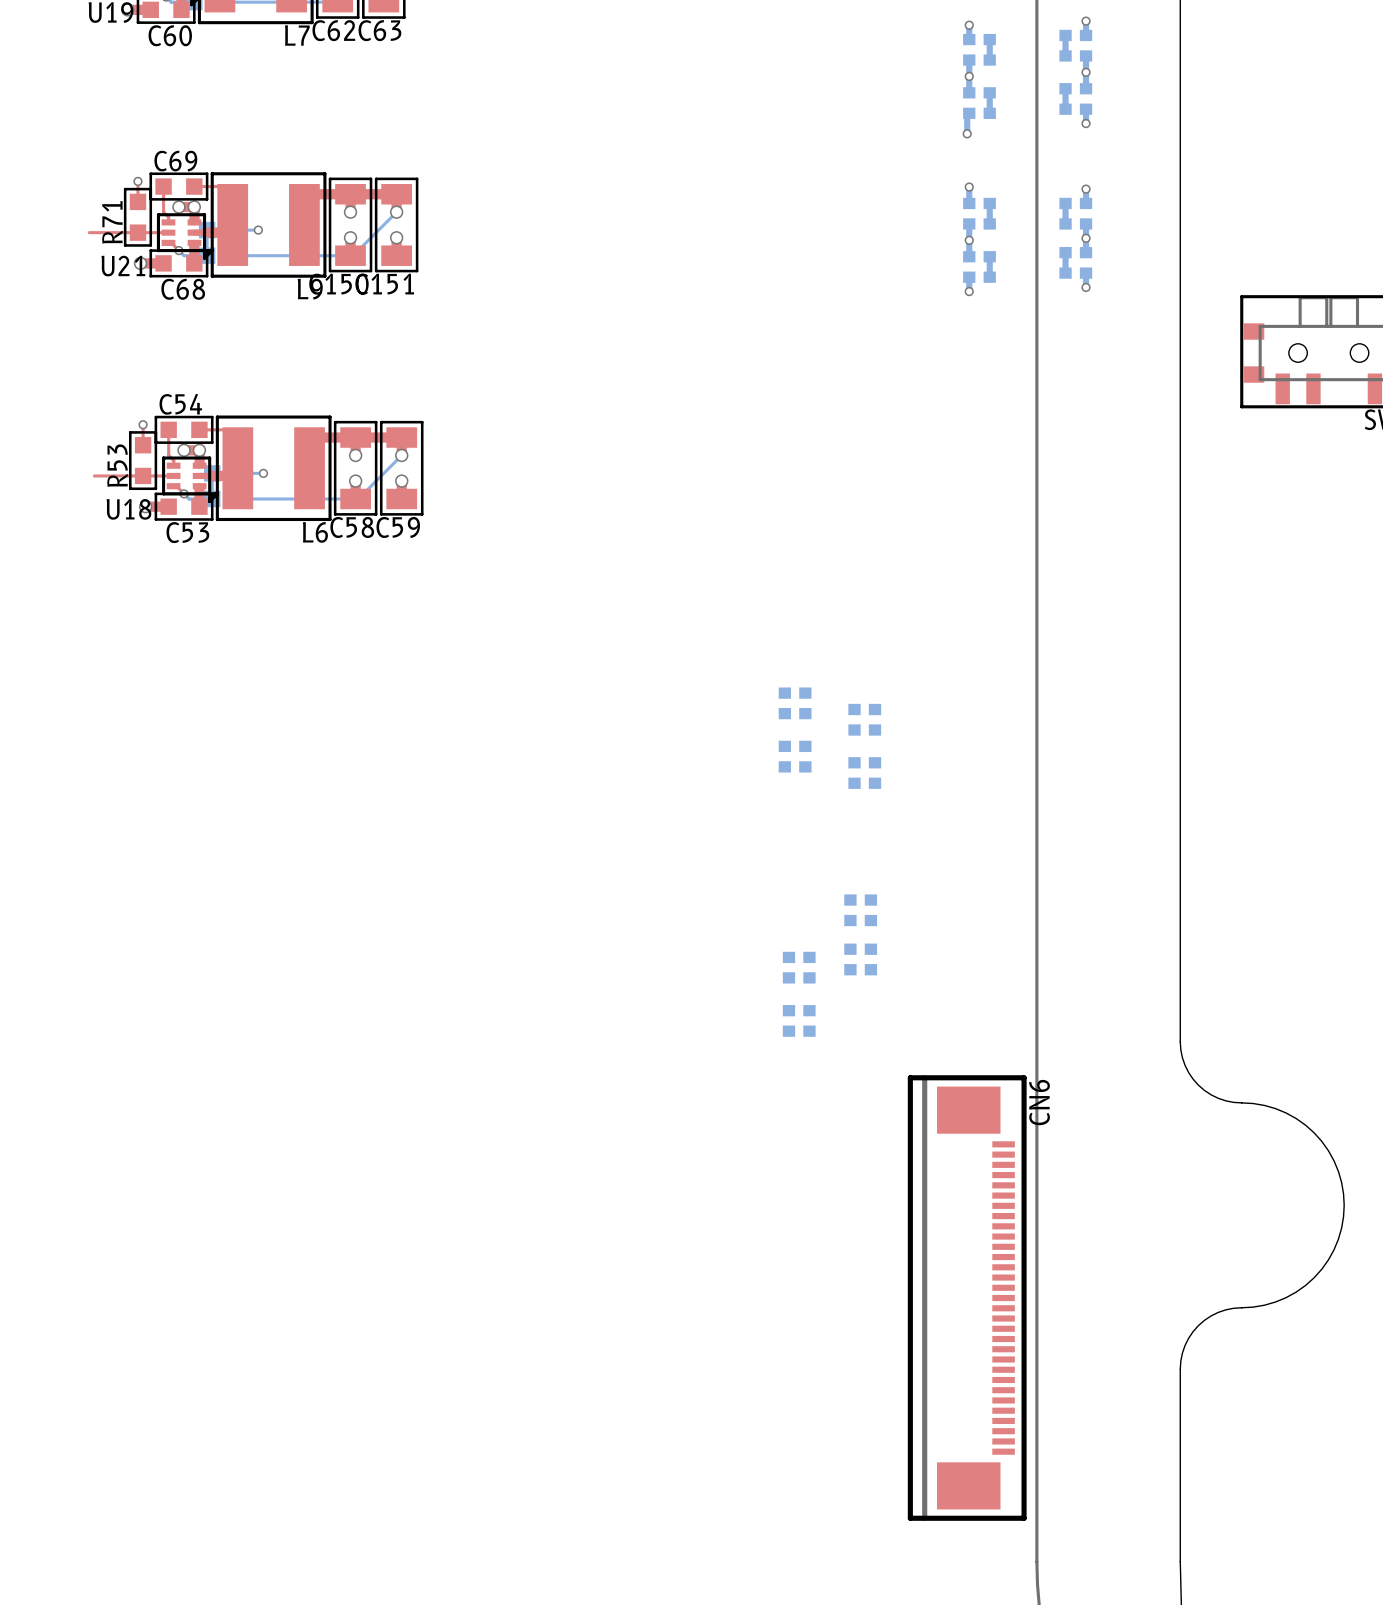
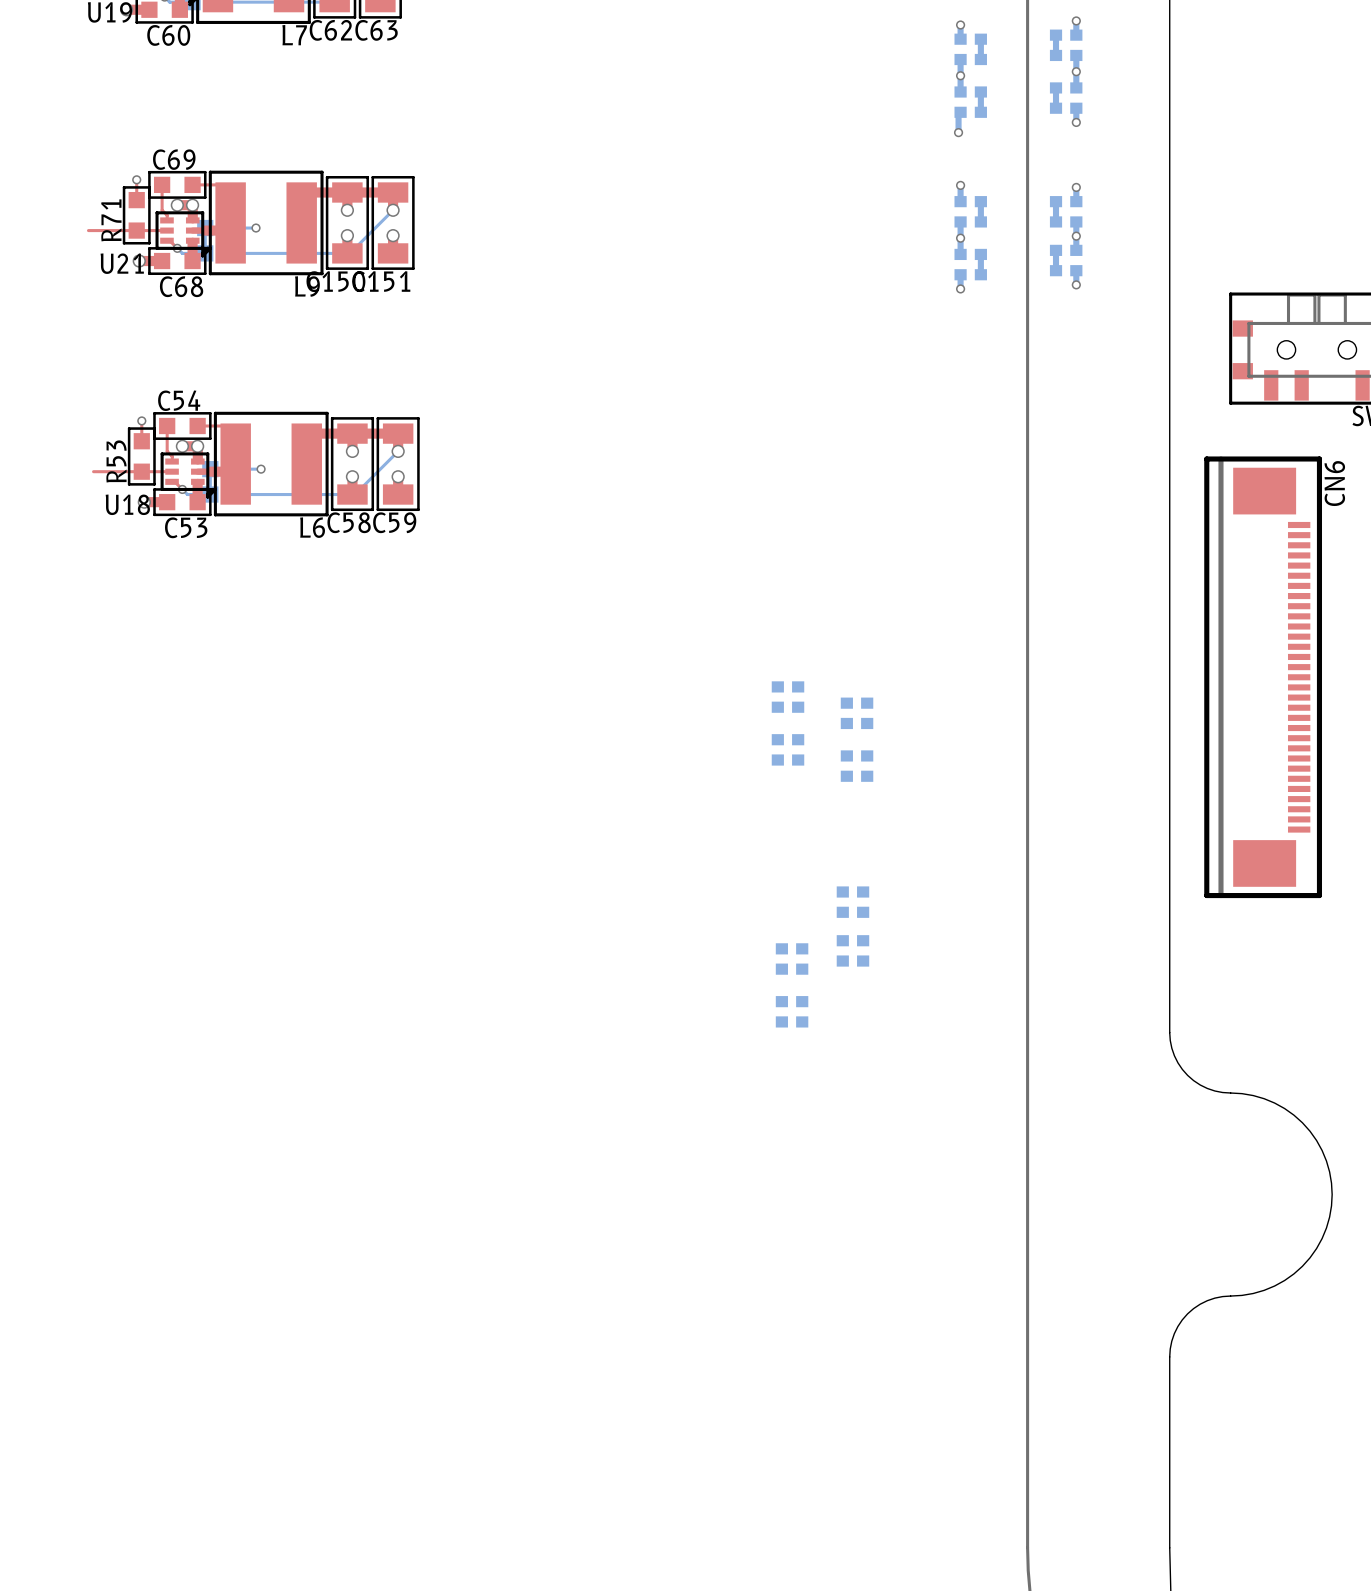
CN6 position: (967, 1298) -> (1263, 677)

